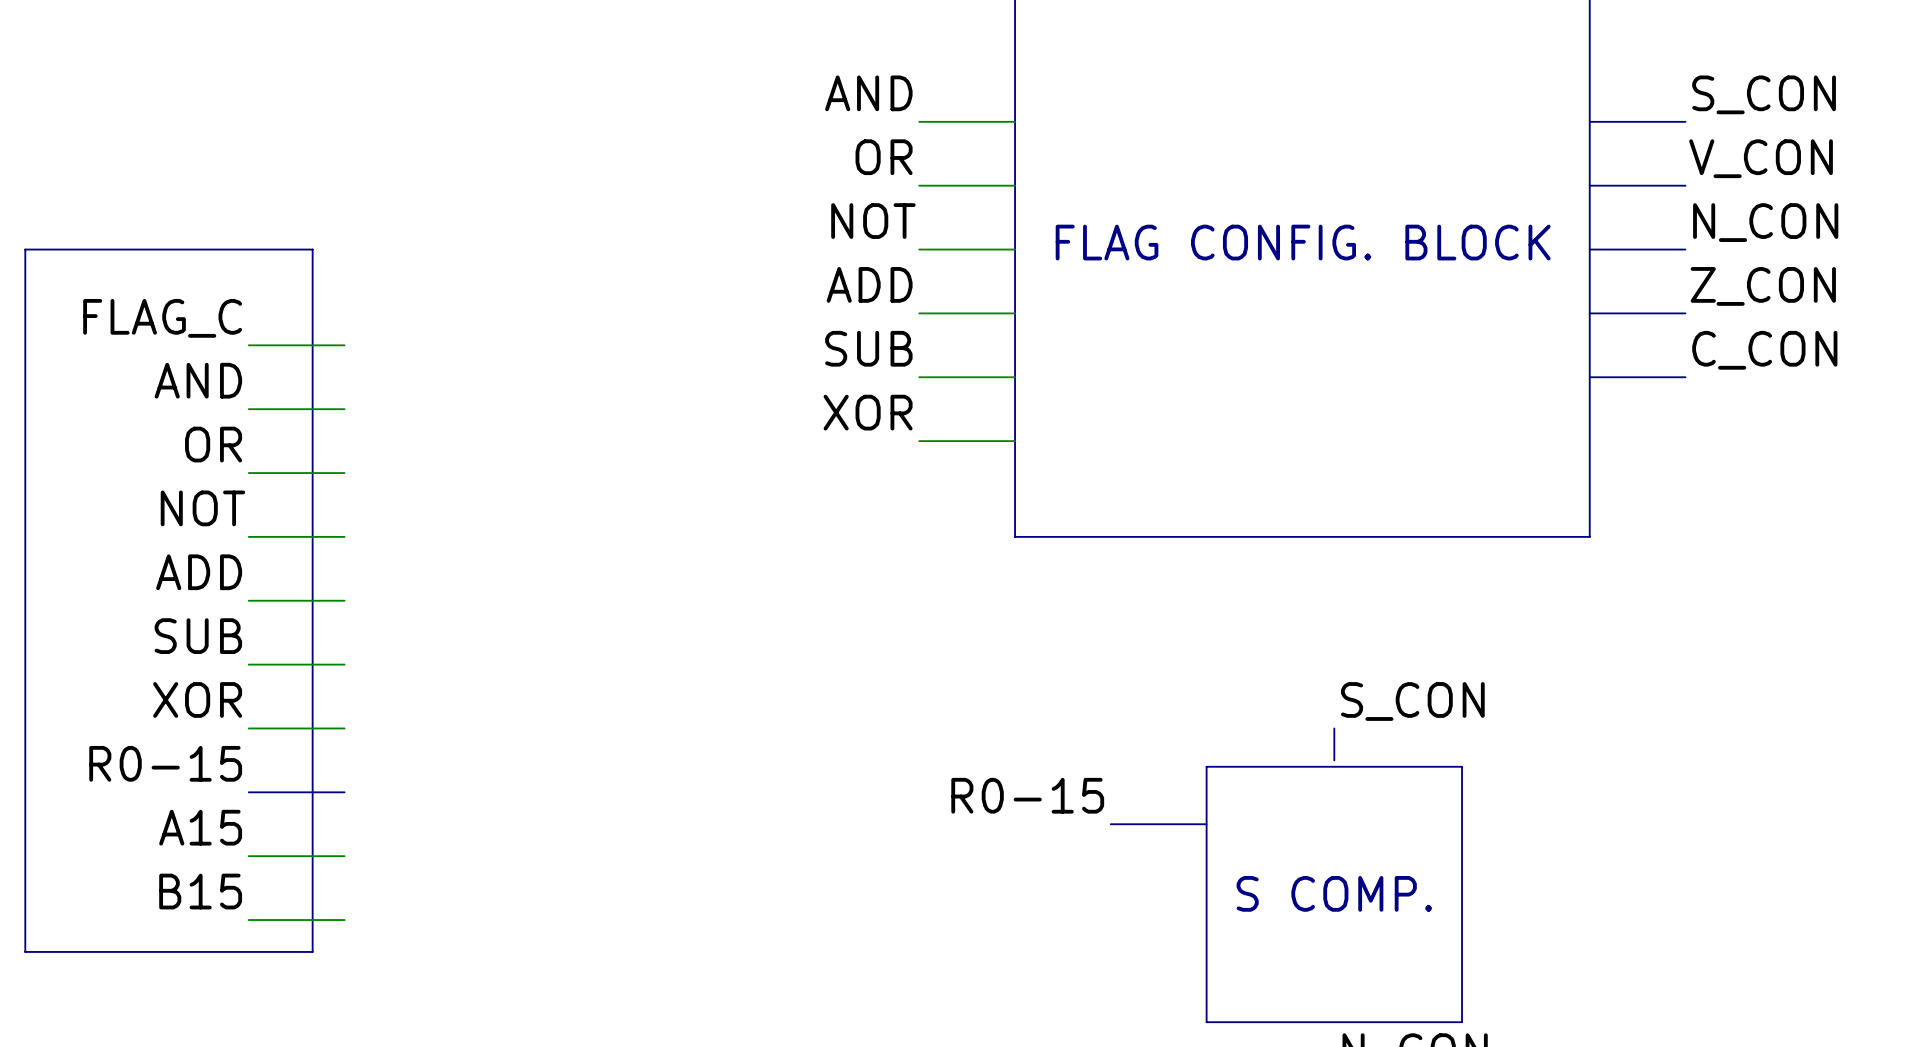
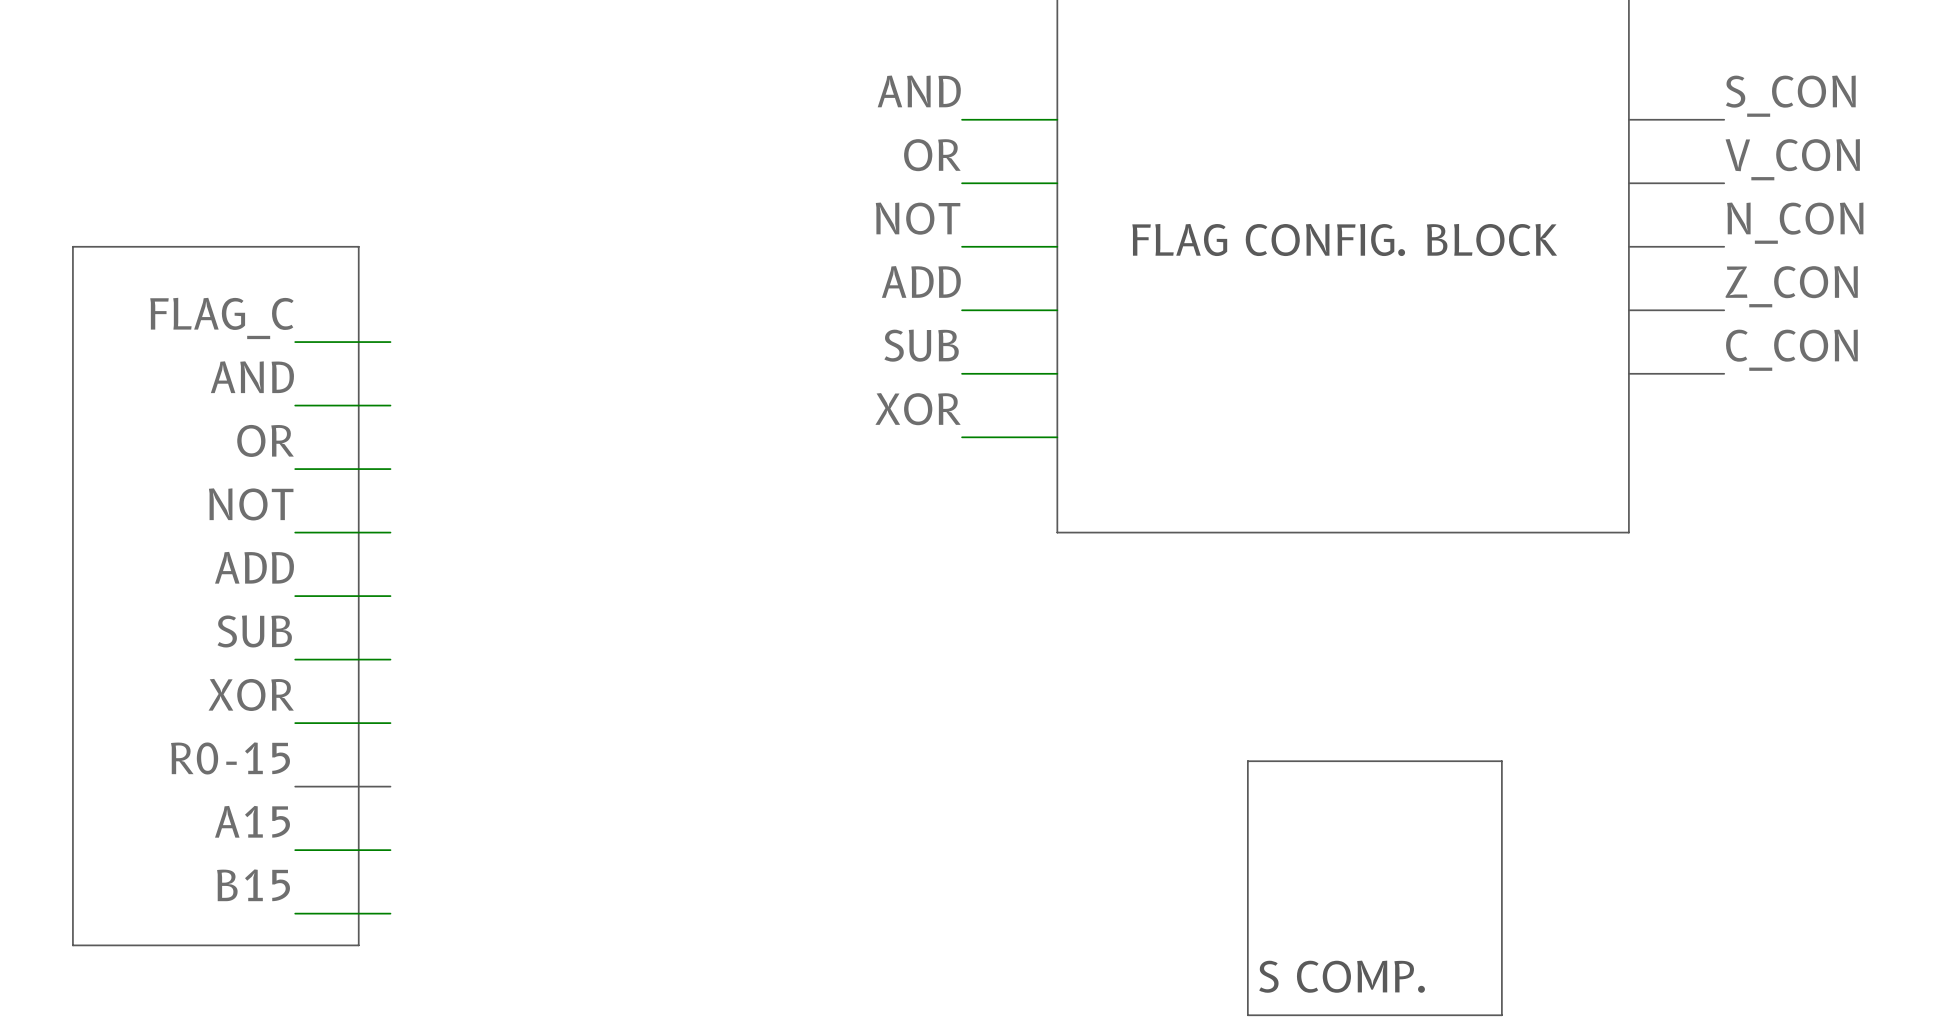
label: S_CON (1412, 701) -> none
bus: (1334, 728) (1334, 760) -> none
label: R0-15 (1027, 795) -> none
bus: (1110, 824) (1206, 824) -> none
text position: S COMP. (1334, 893) -> S COMP. (1342, 976)

